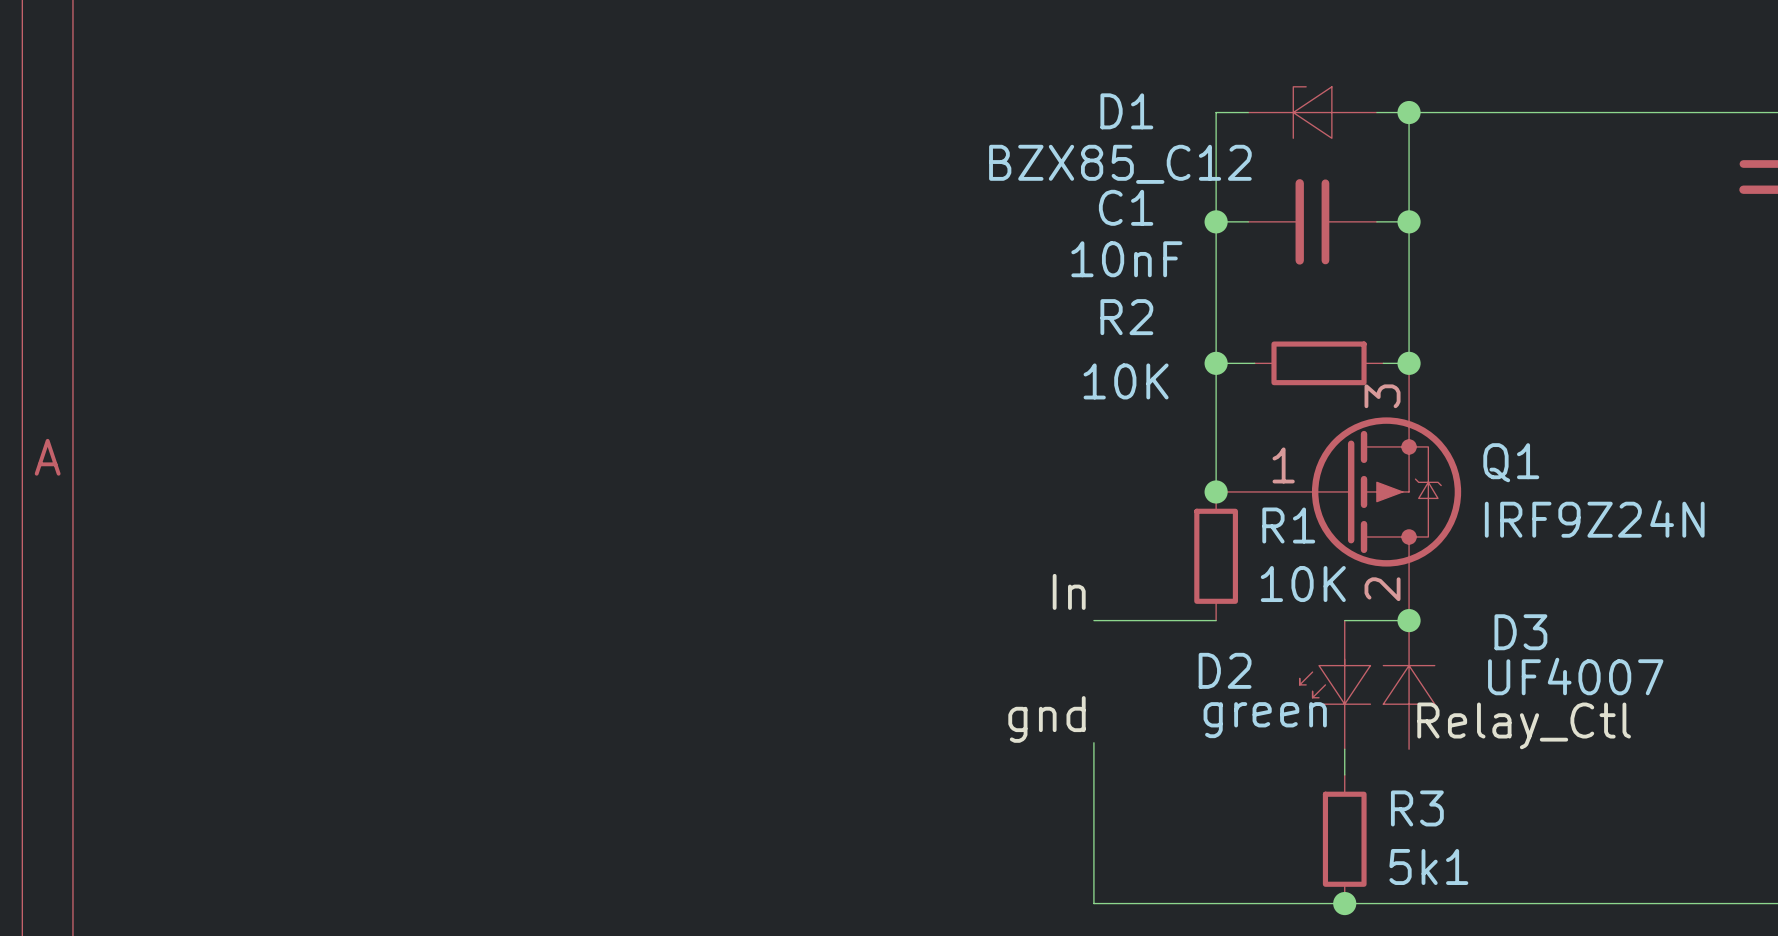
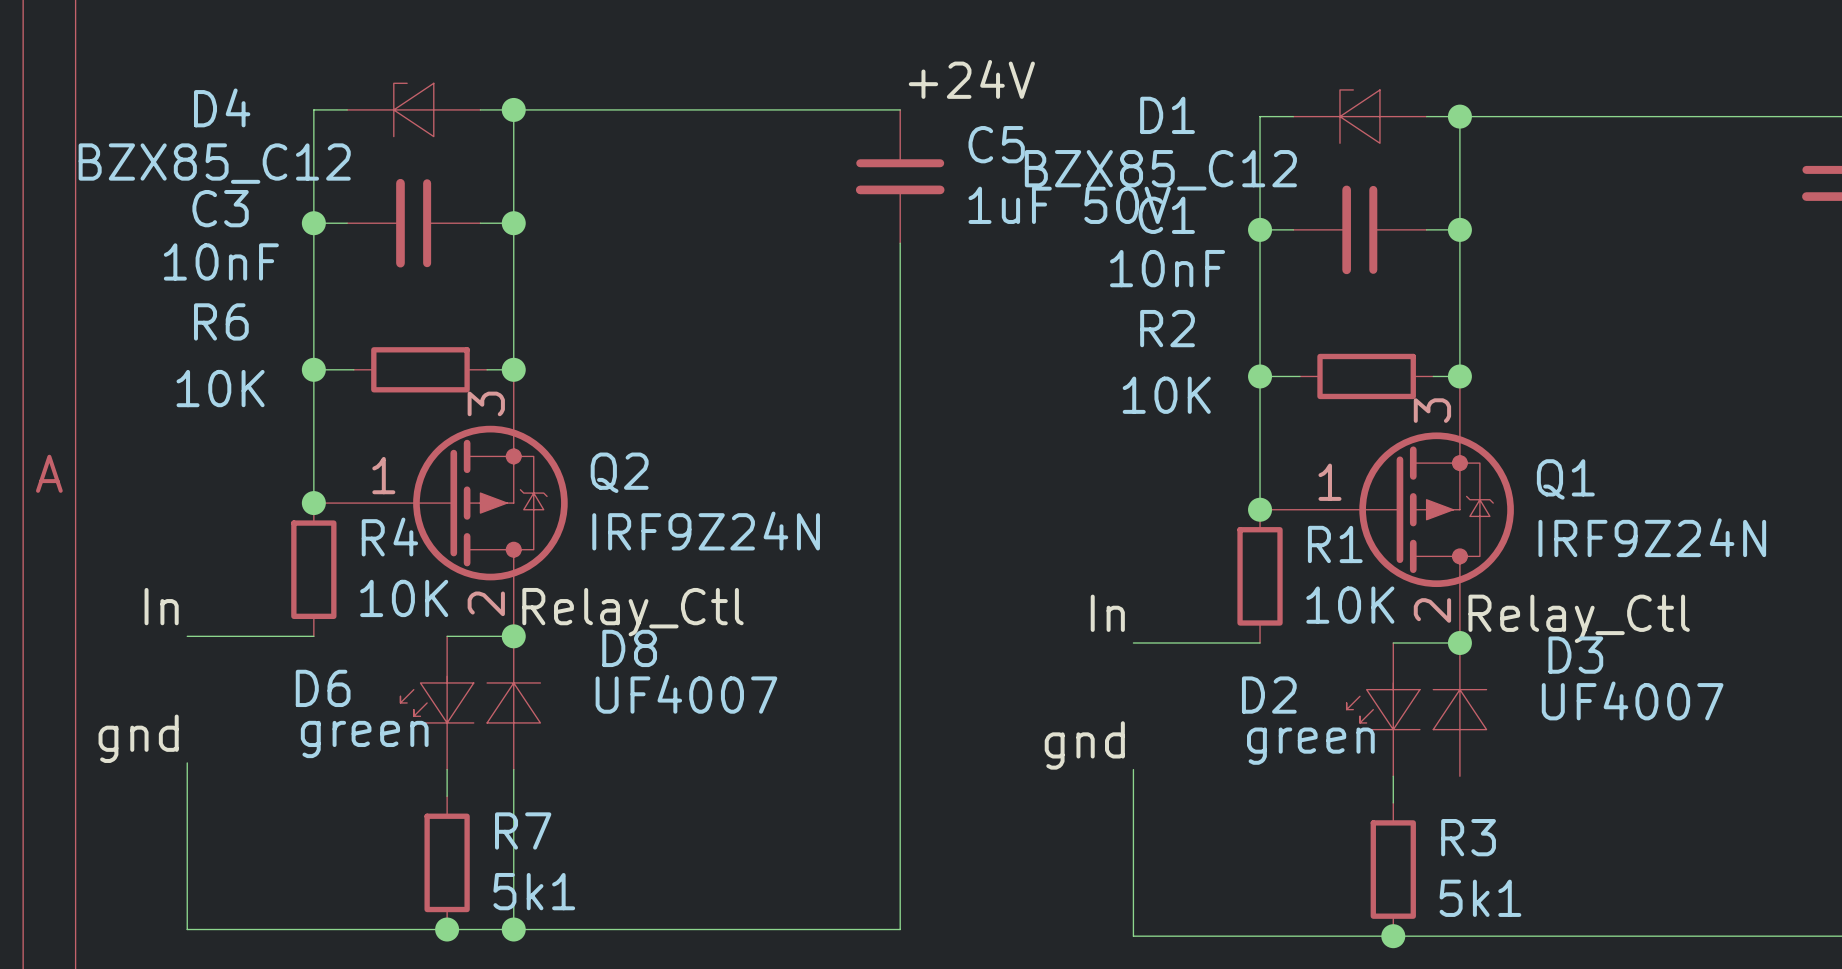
label: none -> +24V (971, 79)
wire: none -> (347, 109) (313, 109) (313, 503)
D4: none -> BZX85_C12 (413, 109)
wire: none -> (480, 109) (900, 109)
wire: none -> (513, 109) (513, 369) (487, 369)
junction: none -> (513, 109)
C5: none -> 1uF 50V (900, 176)
wire: none -> (313, 223) (347, 223)
junction: none -> (313, 223)
C3: none -> 10nF (413, 223)
wire: none -> (480, 223) (513, 223)
junction: none -> (513, 223)
wire: none -> (900, 243) (900, 929) (187, 929) (187, 762)
wire: none -> (313, 369) (353, 369)
junction: none -> (313, 369)
R6: none -> 10K (420, 369)
junction: none -> (513, 369)
junction: none -> (313, 503)
Q2: none -> IRF9Z24N (440, 503)
R4: none -> 10K (313, 569)
label: none -> In (161, 606)
label: none -> Relay_Ctl (632, 612)
wire: none -> (187, 636) (313, 636)
wire: none -> (447, 636) (513, 636)
junction: none -> (513, 636)
D6: none -> green (437, 702)
D8: none -> UF4007 (513, 702)
label: none -> gnd (138, 738)
label position: Relay_Ctl (1524, 725) -> Relay_Ctl (1579, 618)
wire: none -> (447, 769) (447, 796)
wire: none -> (513, 769) (513, 929)
R7: none -> 5k1 (447, 862)
junction: none -> (447, 929)
junction: none -> (513, 929)

